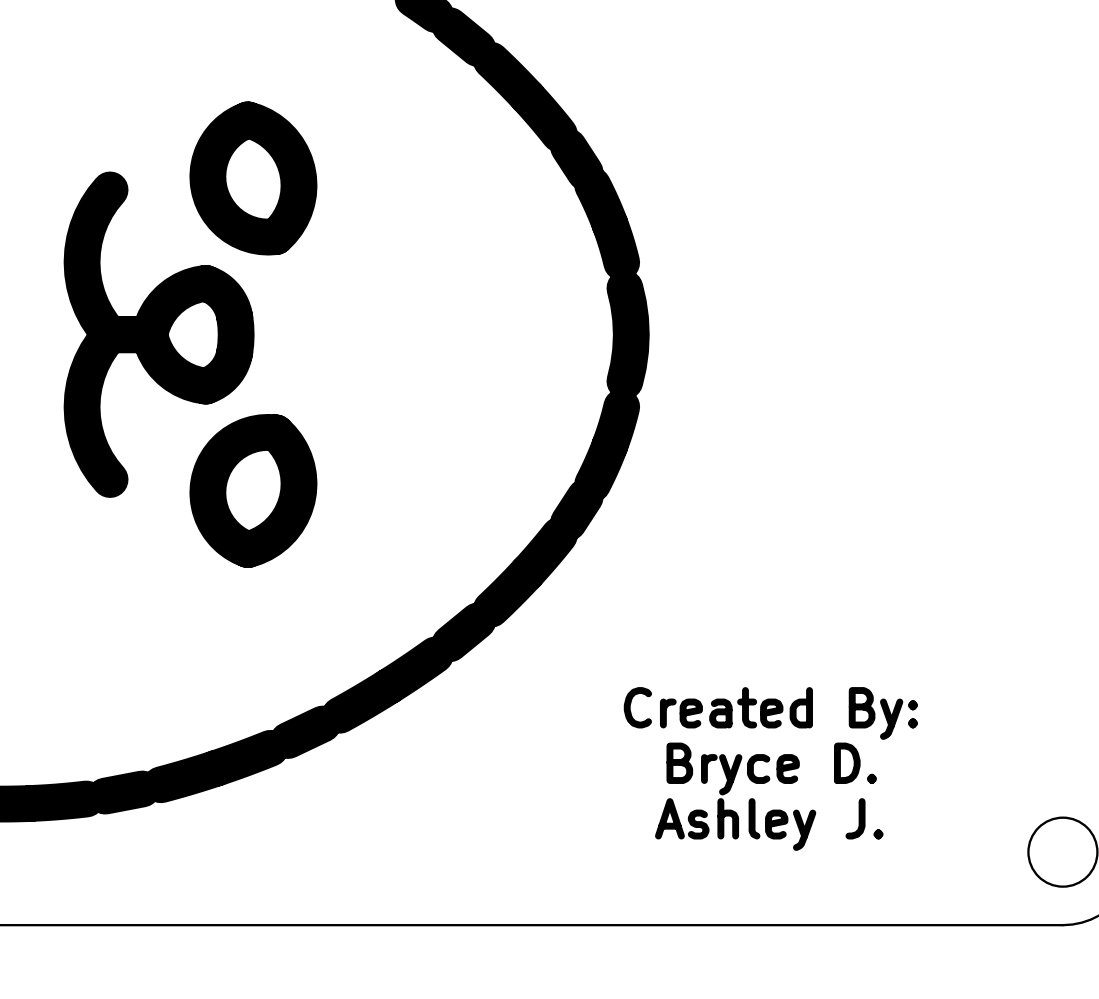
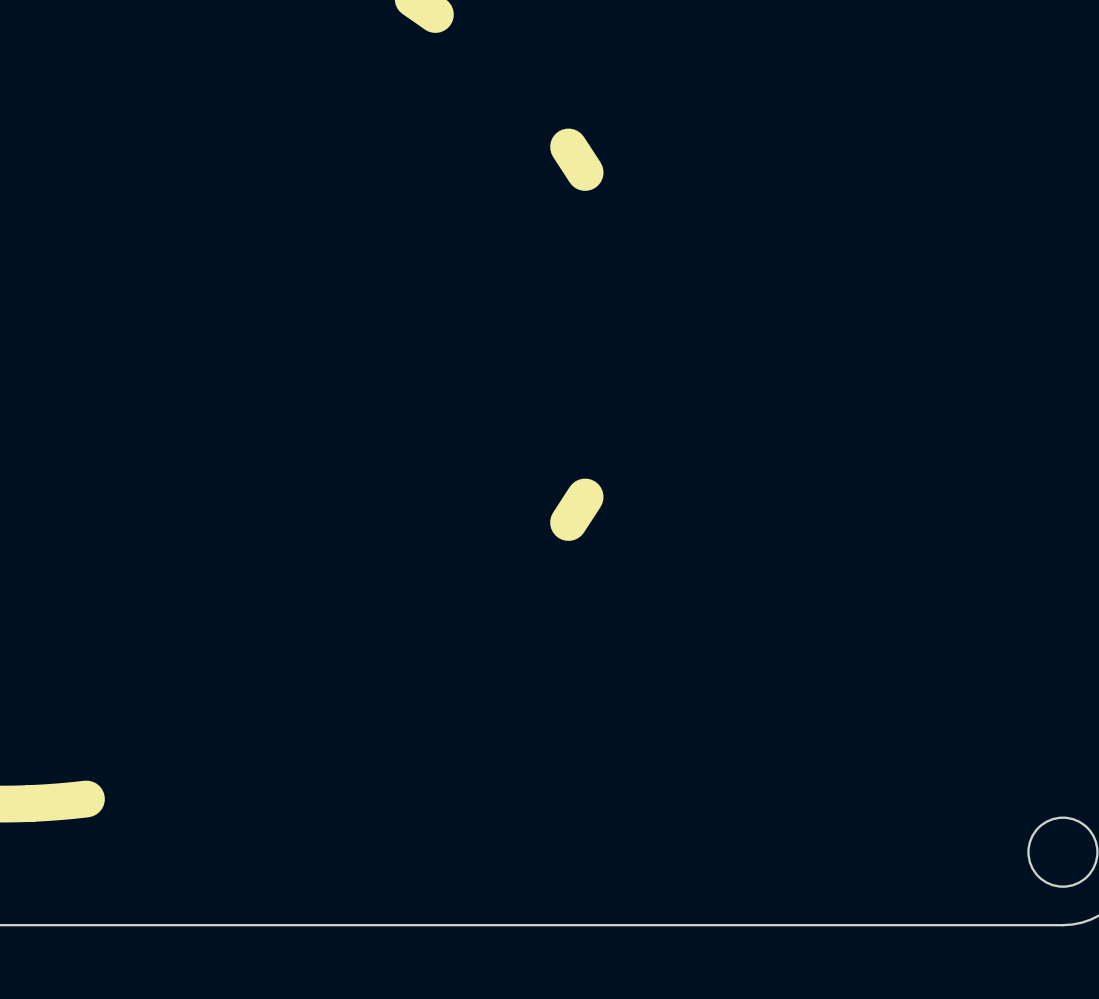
line: (449, 25) (477, 48) -> none
line: (491, 60) (527, 96) (559, 134) -> none
line: (247, 119) (241, 122) (228, 130) (215, 147) (208, 168) (209, 190) (218, 210) (233, 226) (254, 235) (275, 236) (286, 224) (294, 210) (299, 186) (297, 169) (291, 154) (276, 135) (263, 125) (255, 122) (247, 119) -> none
line: (592, 185) (609, 224) (621, 262) -> none
line: (110, 189) (96, 208) (87, 228) (82, 262) (87, 295) (96, 316) (110, 334) -> none
line: (624, 288) (631, 334) (624, 381) -> none
line: (110, 334) (96, 353) (87, 373) (82, 407) (87, 440) (96, 461) (110, 479) -> none
line: (149, 334) (158, 357) (169, 369) (190, 382) (205, 386) (221, 376) (232, 361) (236, 334) (233, 312) (227, 299) (218, 289) (205, 283) (197, 284) (182, 290) (163, 305) (154, 319) (149, 334) -> none
line: (621, 406) (609, 445) (592, 484) -> none
line: (275, 432) (254, 434) (233, 443) (218, 458) (209, 478) (208, 500) (215, 521) (228, 538) (247, 549) (263, 543) (276, 534) (287, 522) (297, 499) (298, 475) (294, 459) (286, 445) (275, 432) -> none
line: (559, 535) (527, 572) (491, 609) -> none
line: (477, 620) (449, 643) -> none
line: (435, 654) (388, 686) (339, 715) -> none
text: Created By: (770, 713) -> none
line: (322, 724) (288, 740) -> none
line: (270, 748) (216, 768) (160, 784) -> none
text: Bryce D. (771, 769) -> none
line: (142, 788) (105, 796) -> none
text: Ashley J. (769, 824) -> none

